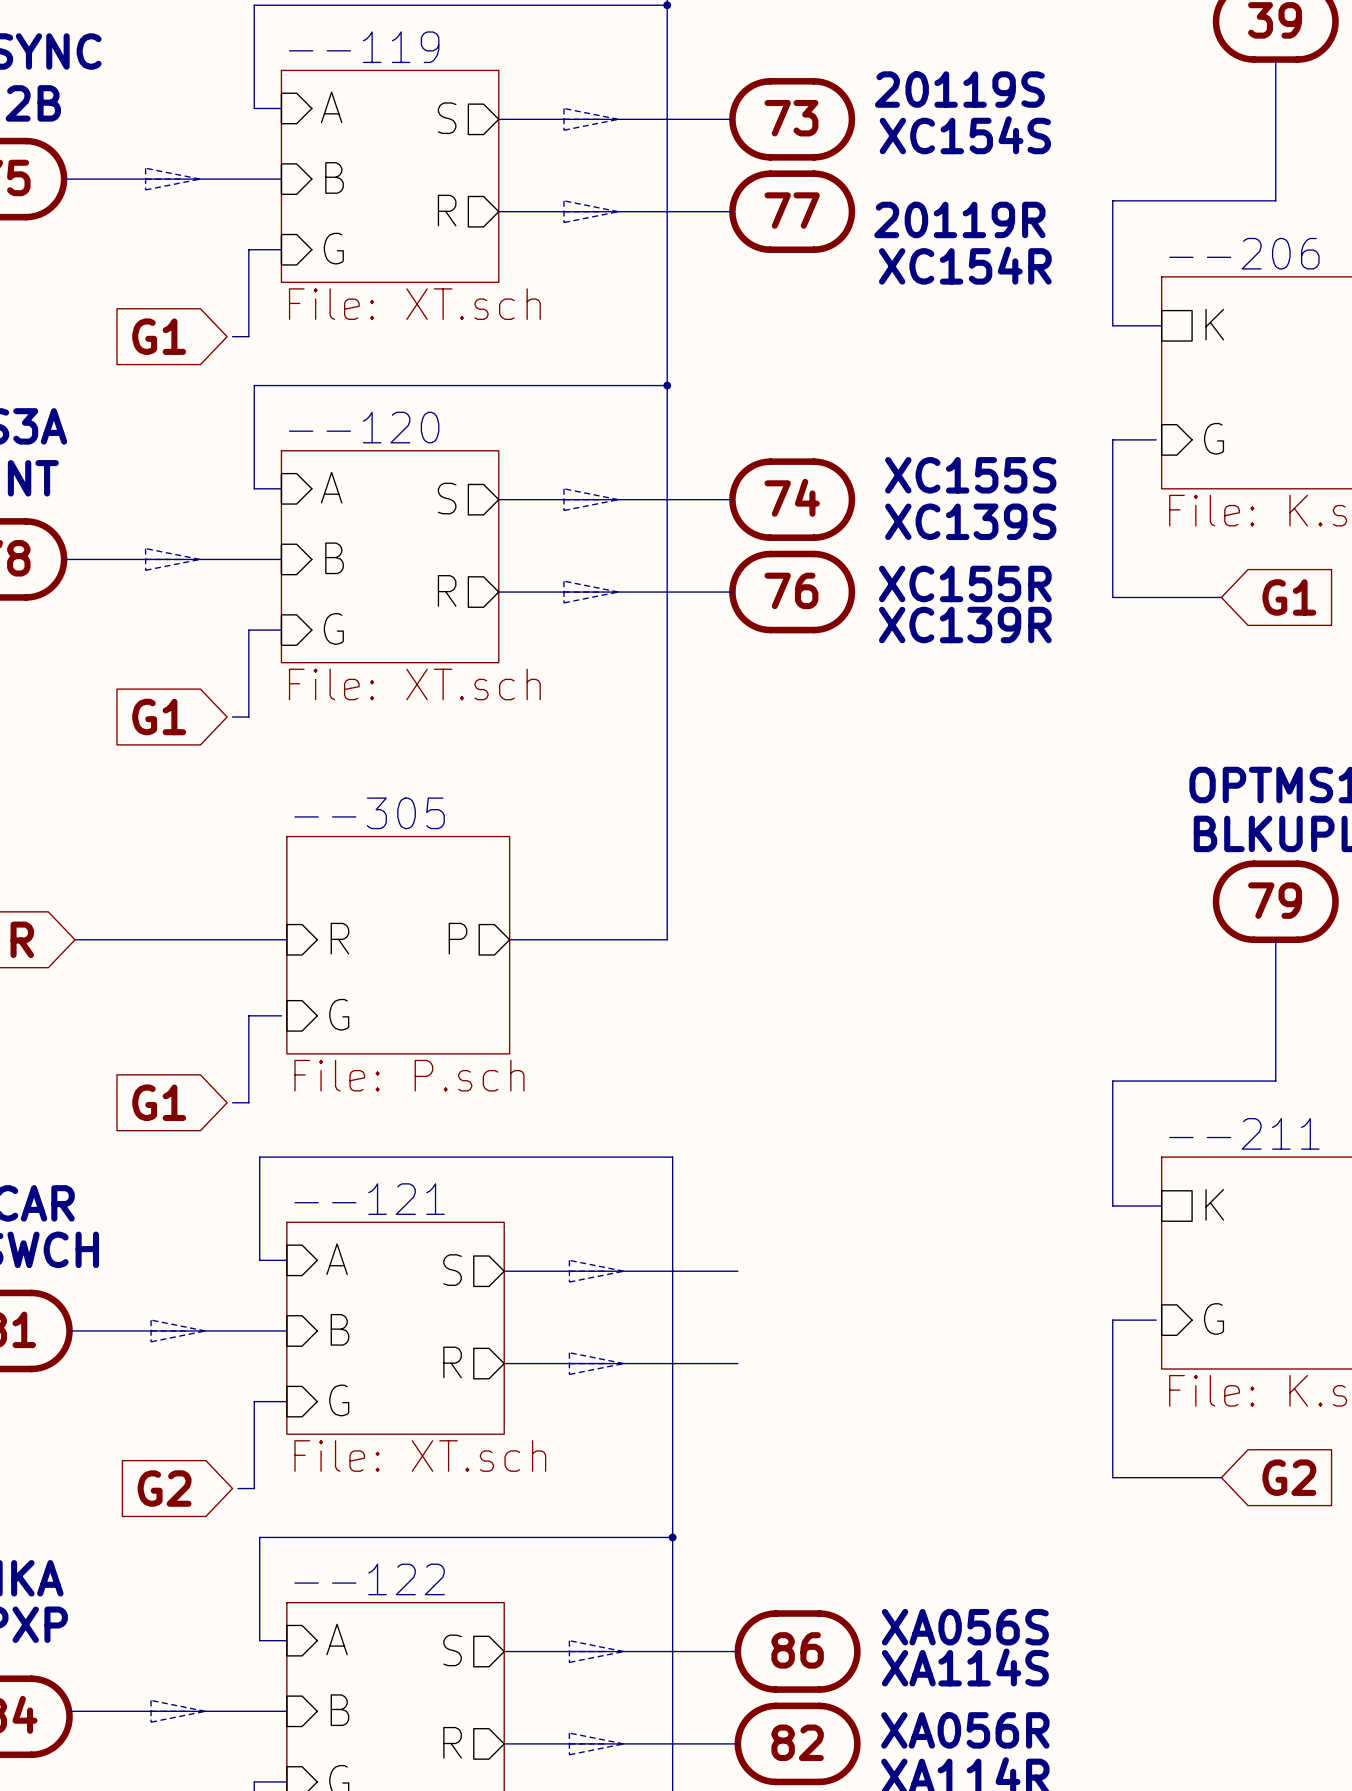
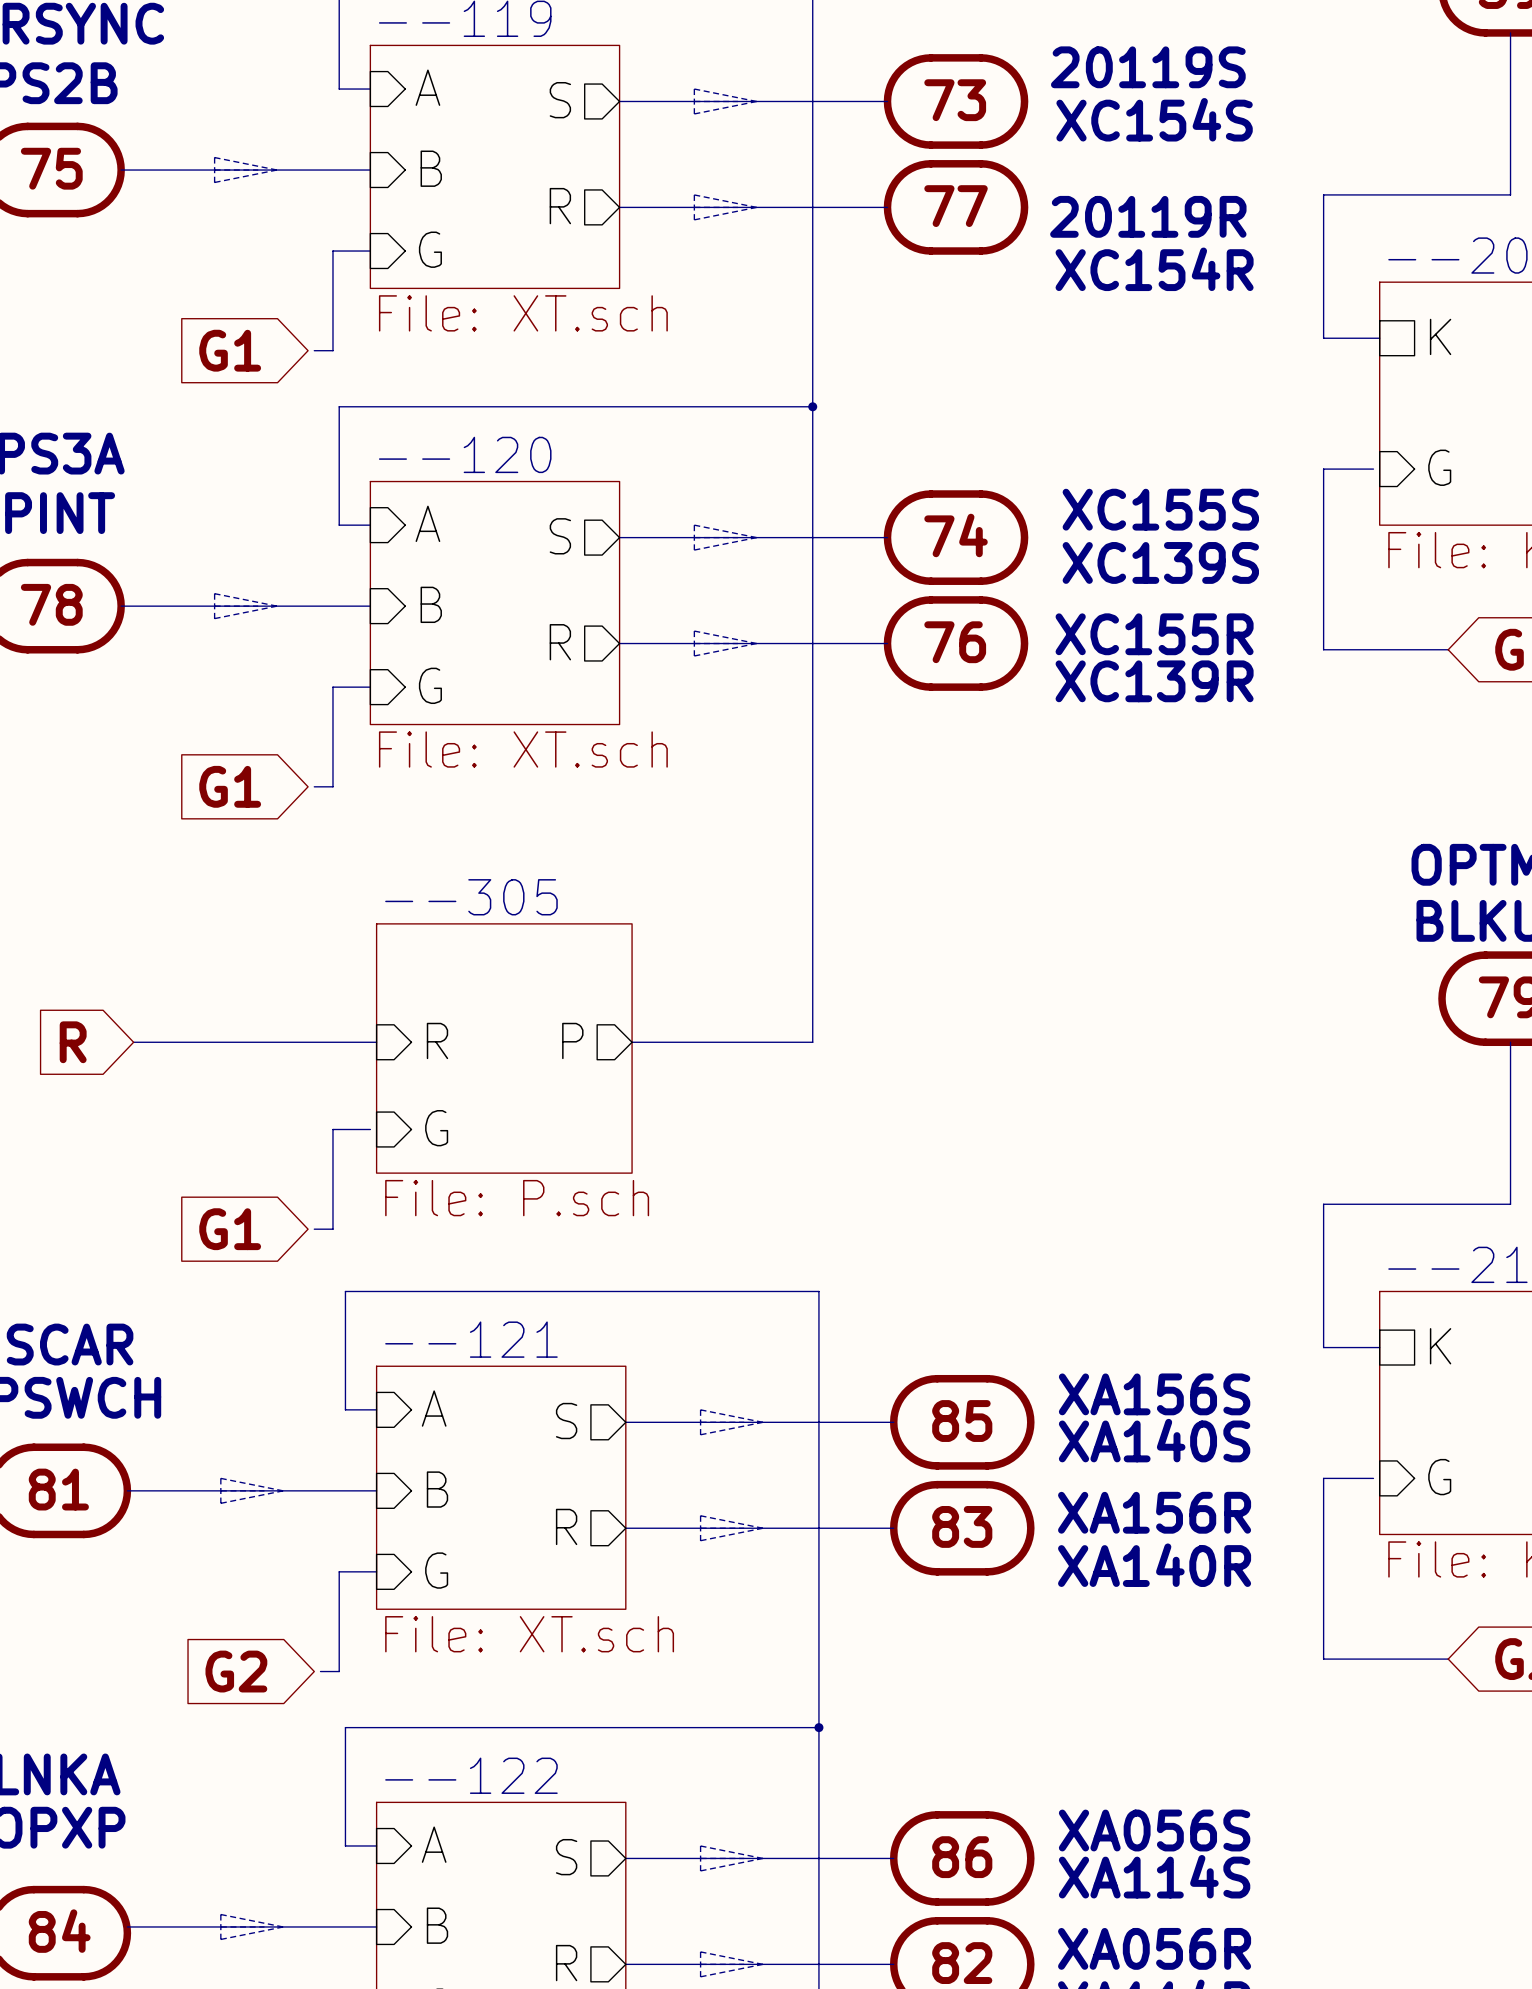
part: none -> (962, 1422)
part: none -> (962, 1528)

